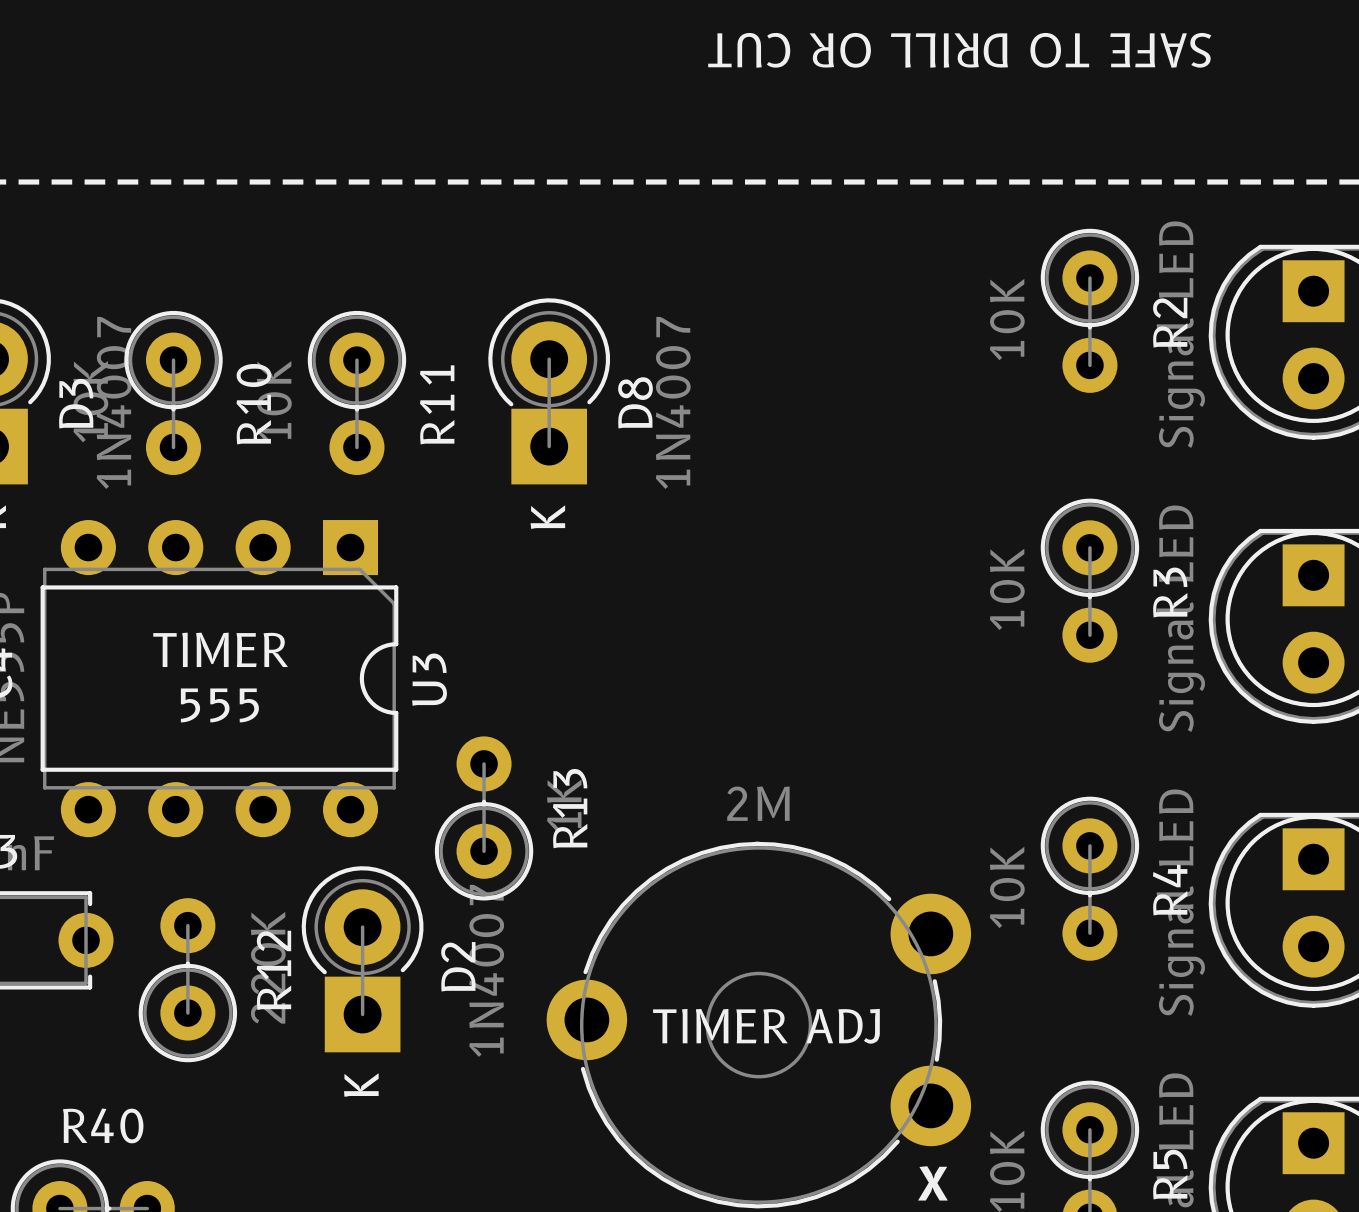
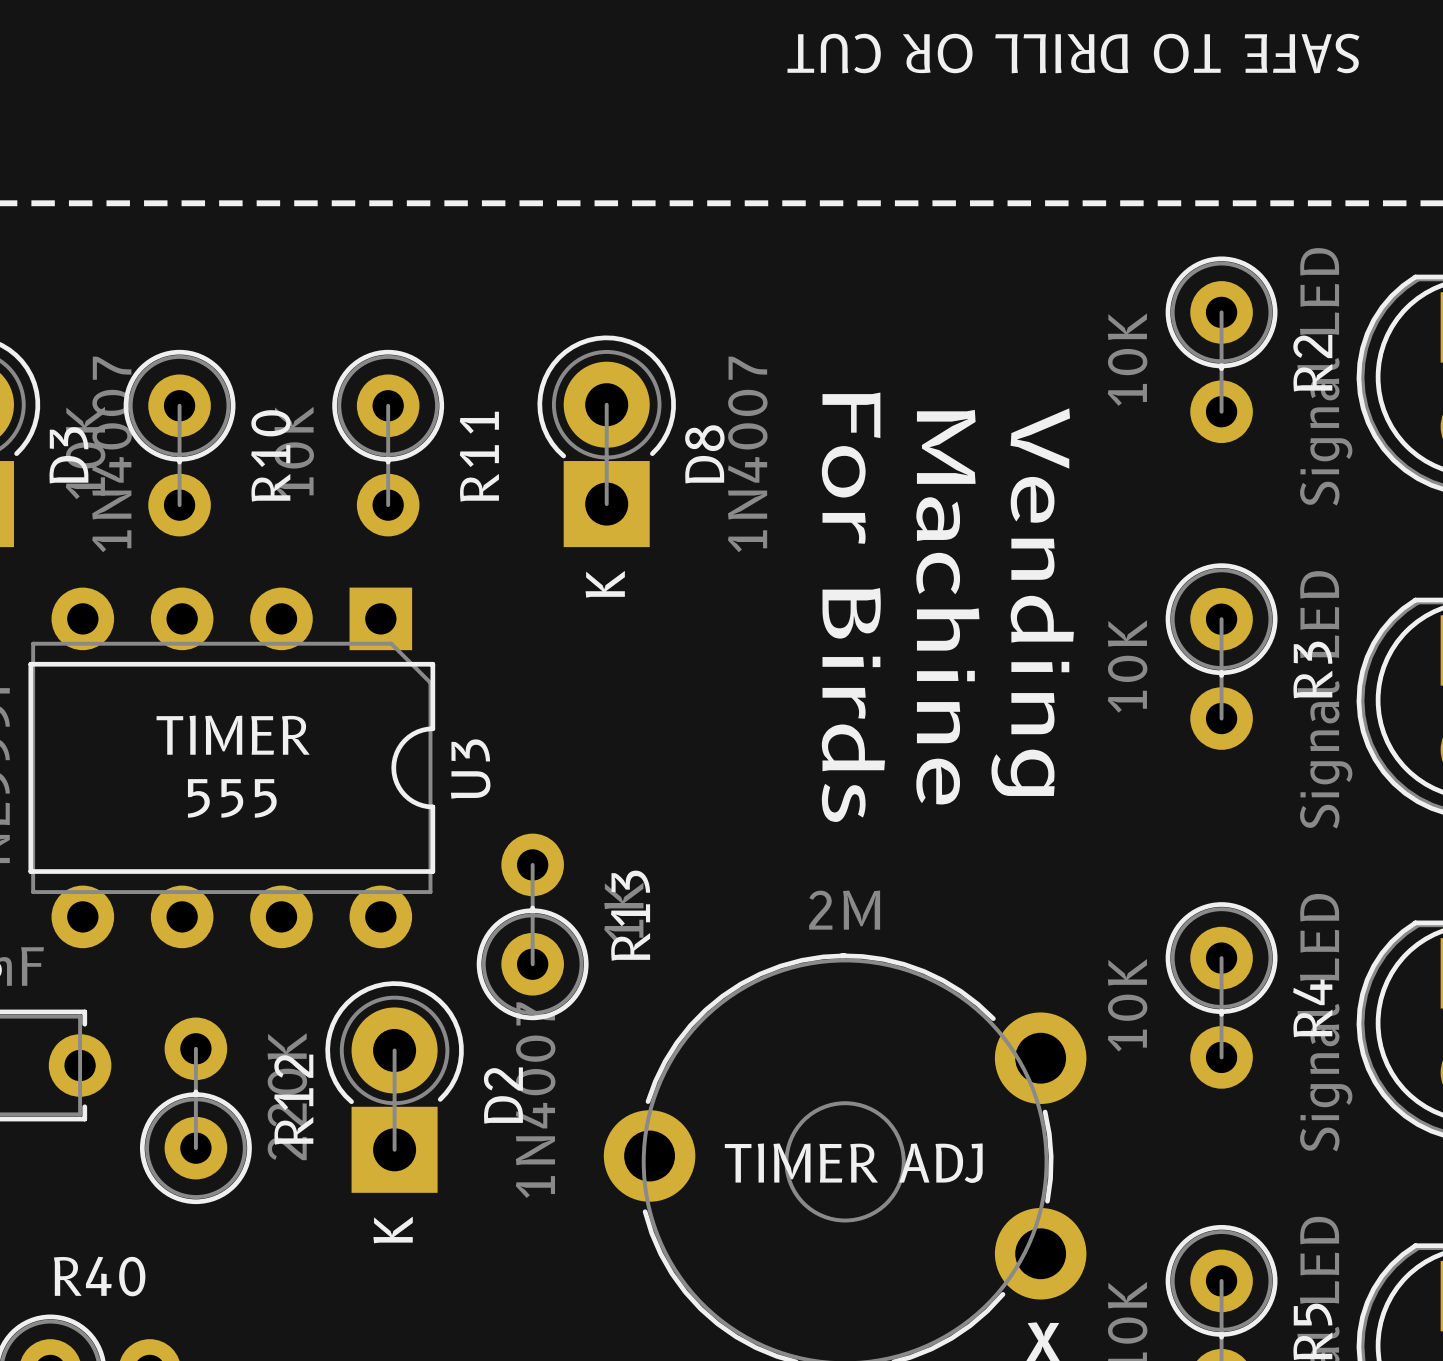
text: none -> Vending (1032, 602)
text: none -> For Birds (853, 607)
text: none -> Machine (947, 607)

